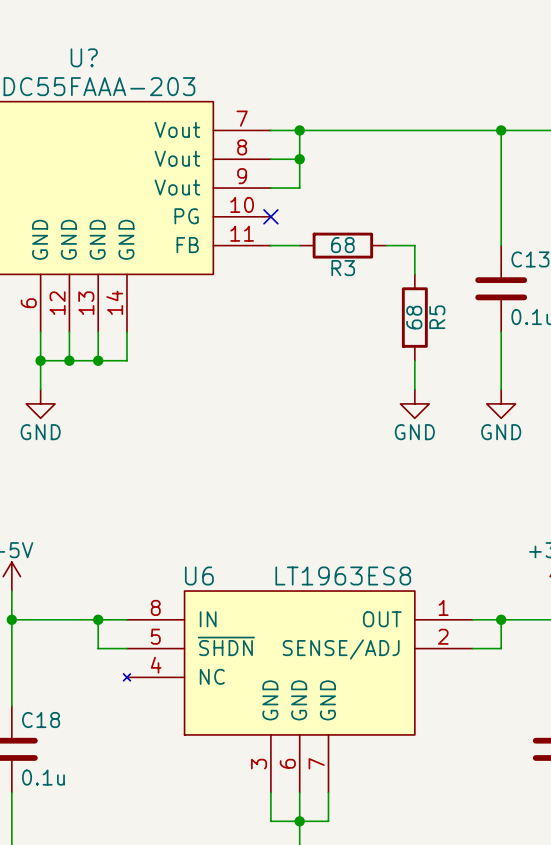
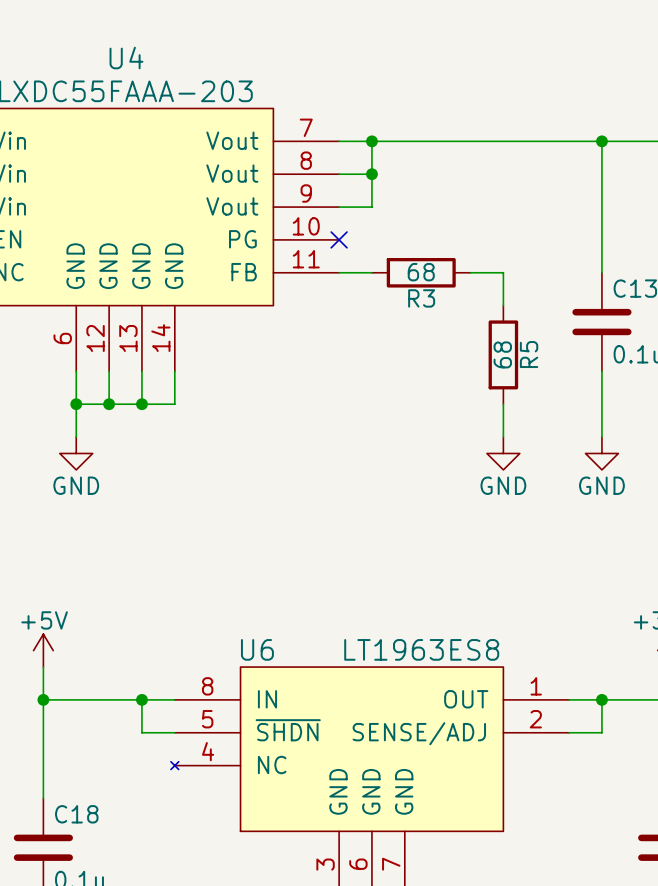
U? name: U? (84, 57) -> U4 (126, 58)

